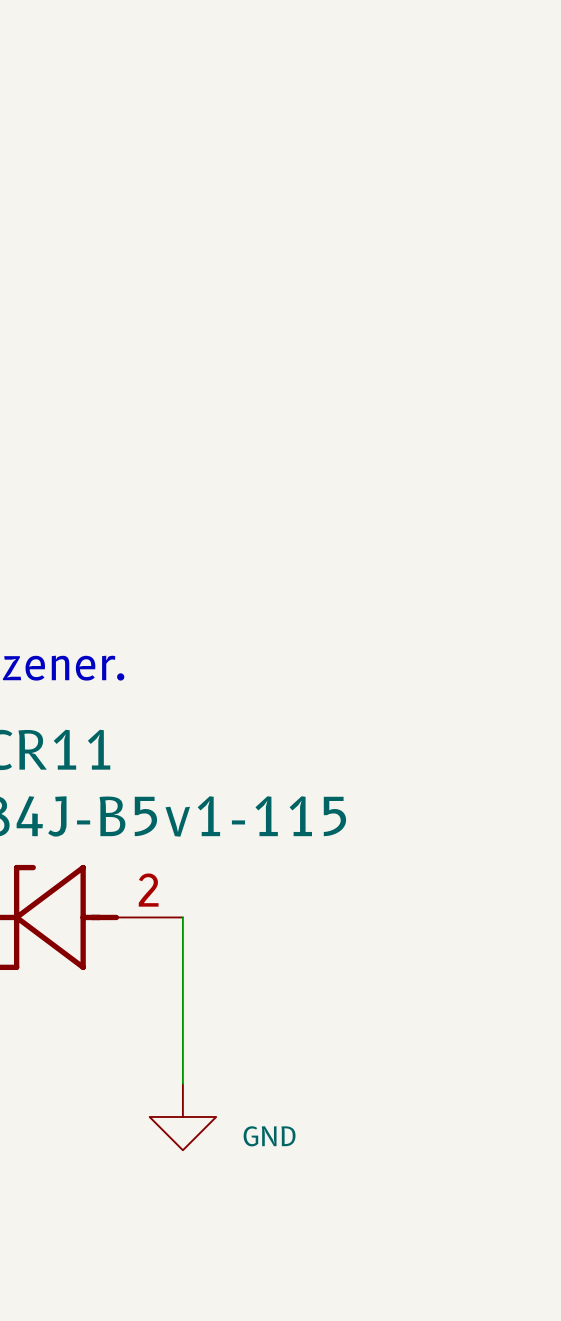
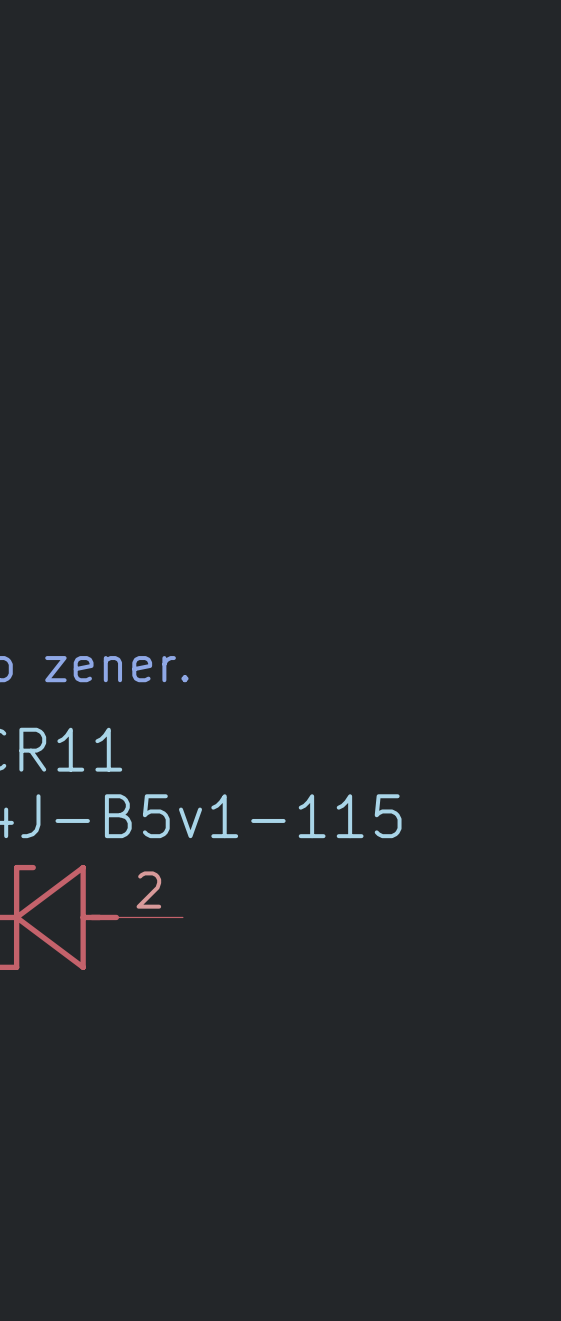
wire: (182, 917) (182, 1083) -> none
power symbol: GND (182, 1116) -> none

